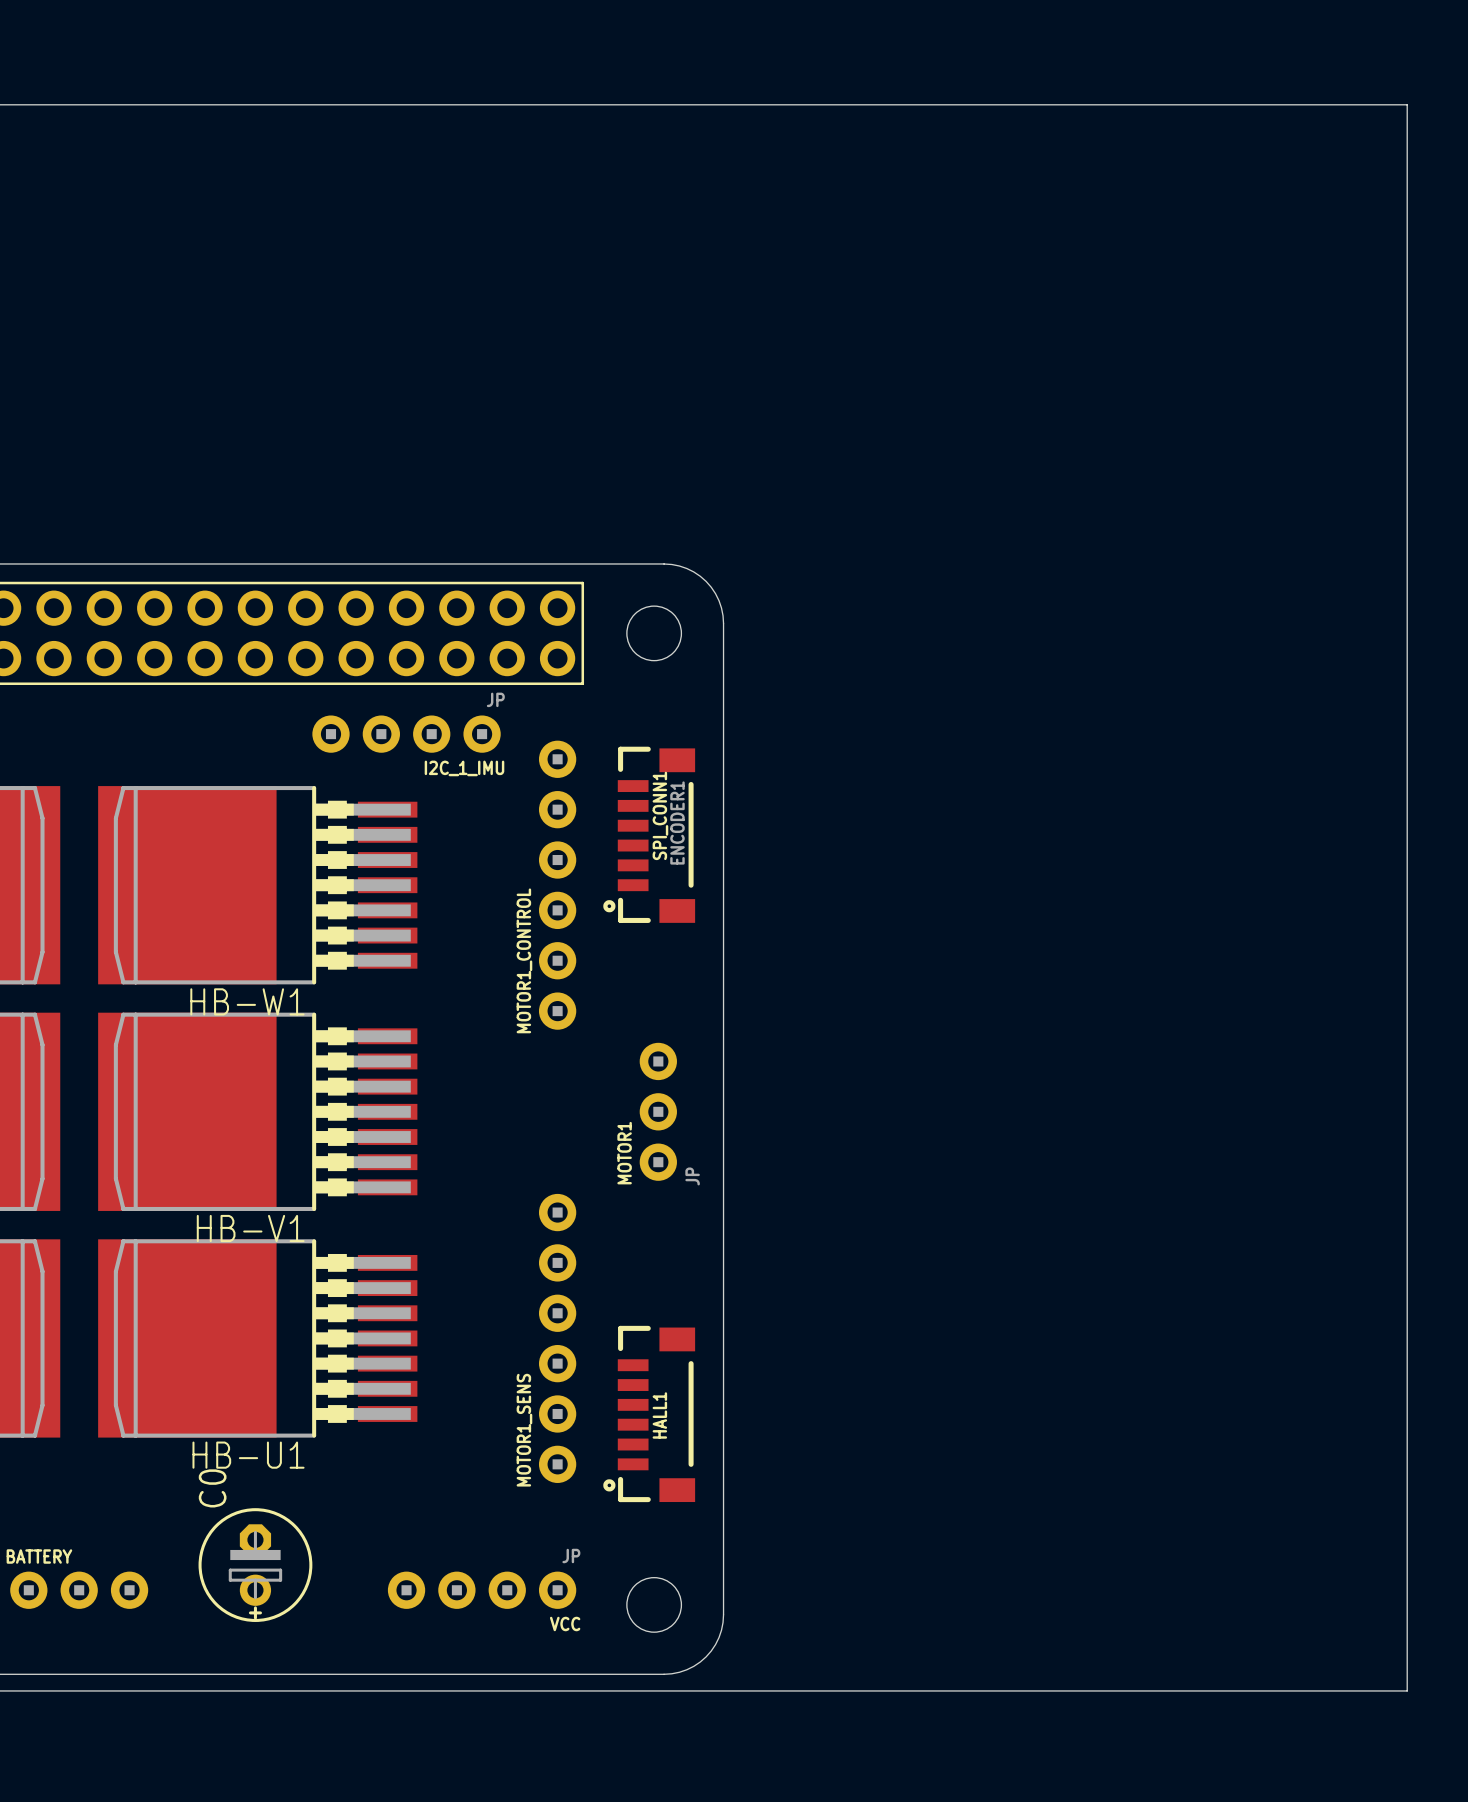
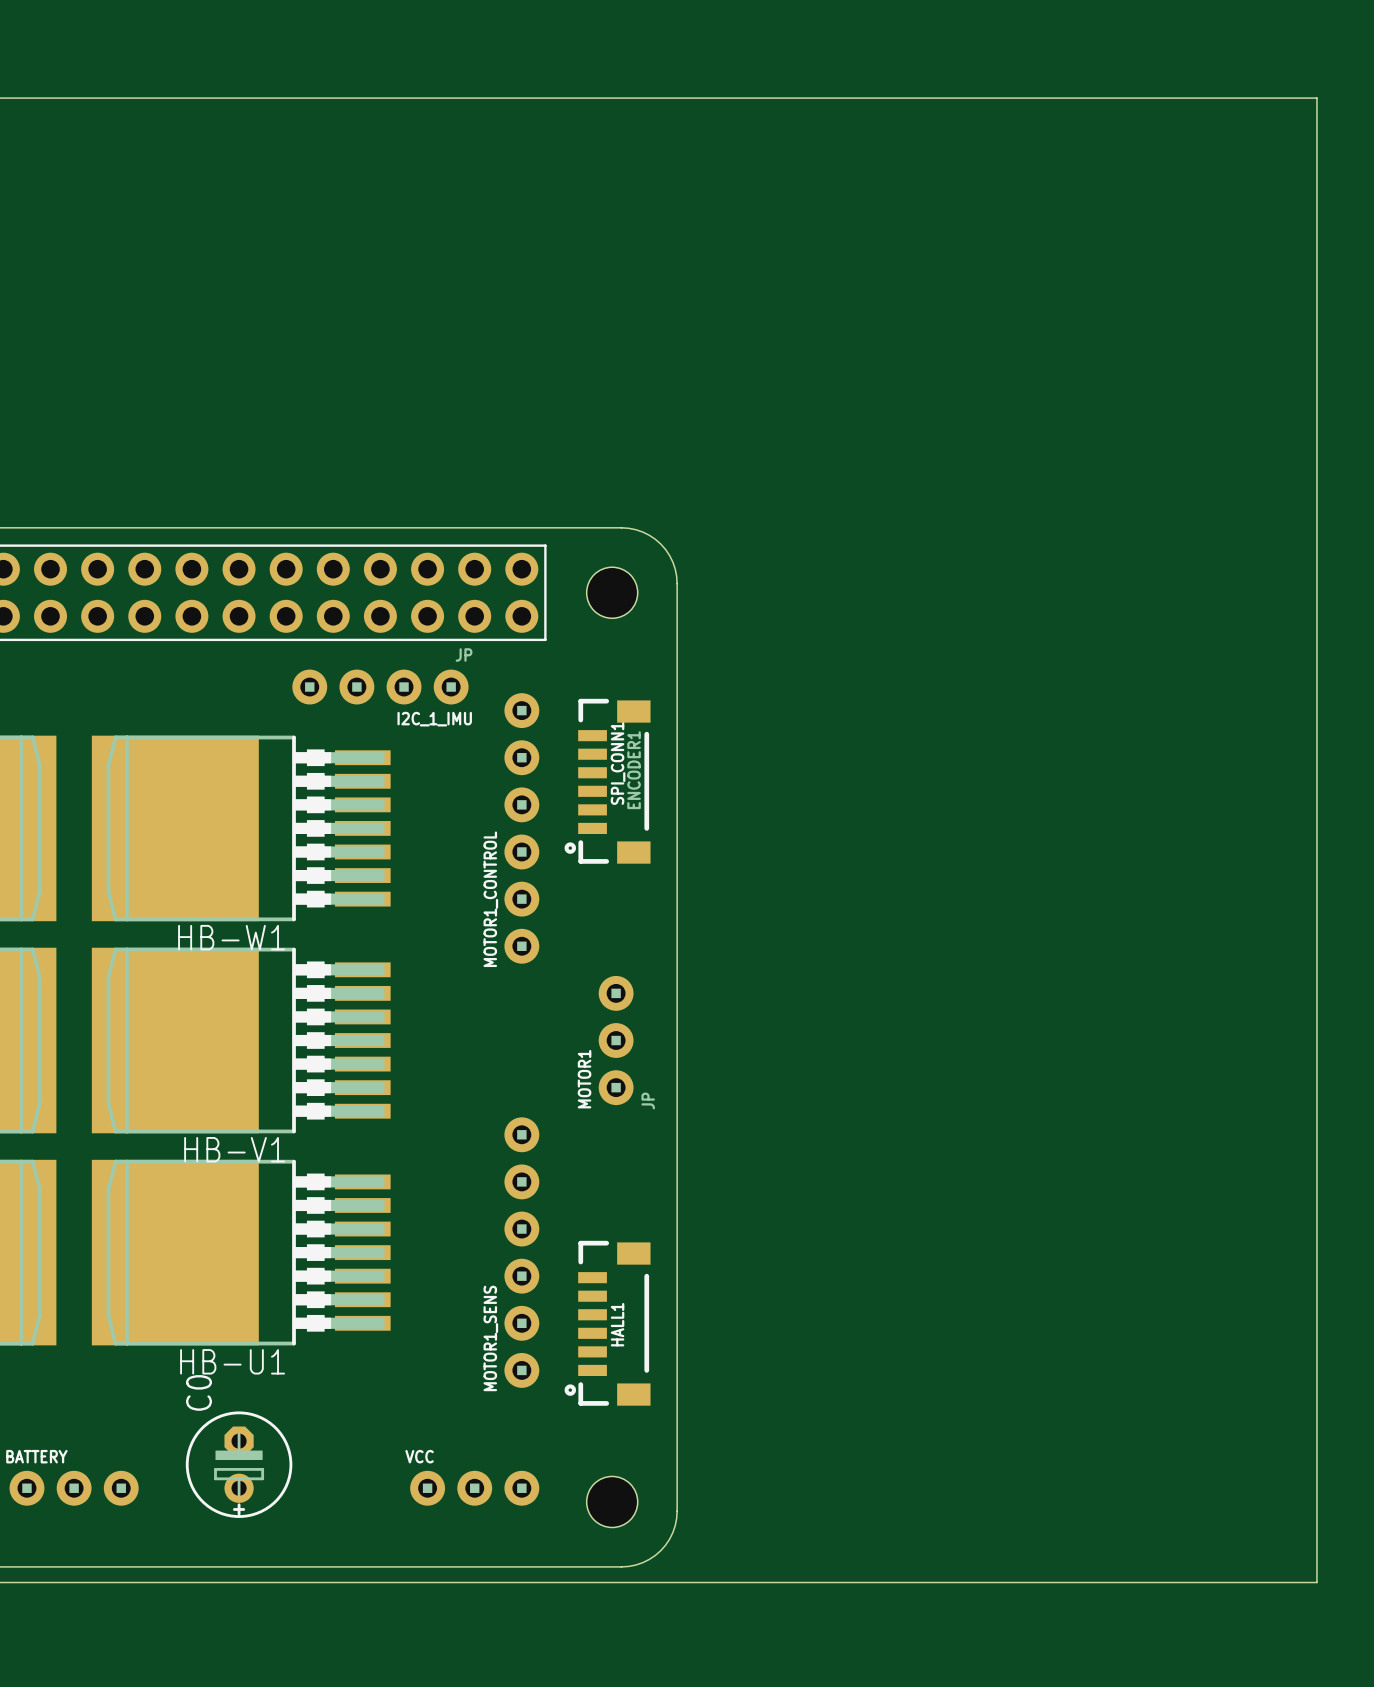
VCC: JP (482, 1590) -> none
VCC: none -> (474, 1488)

